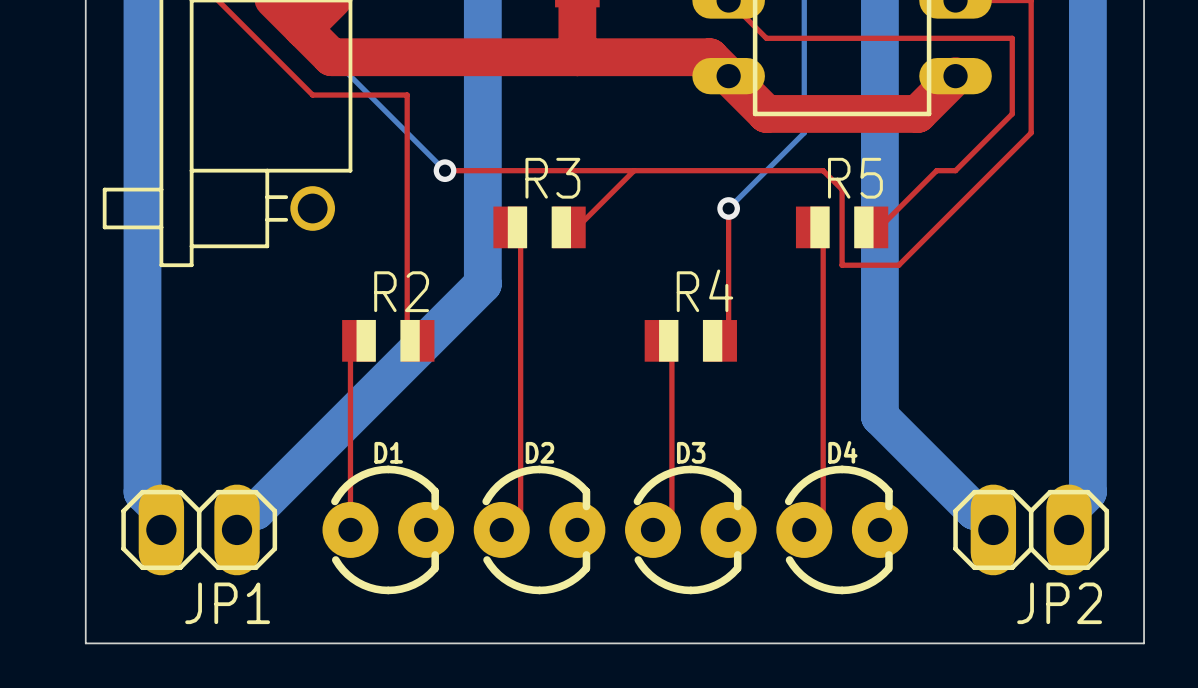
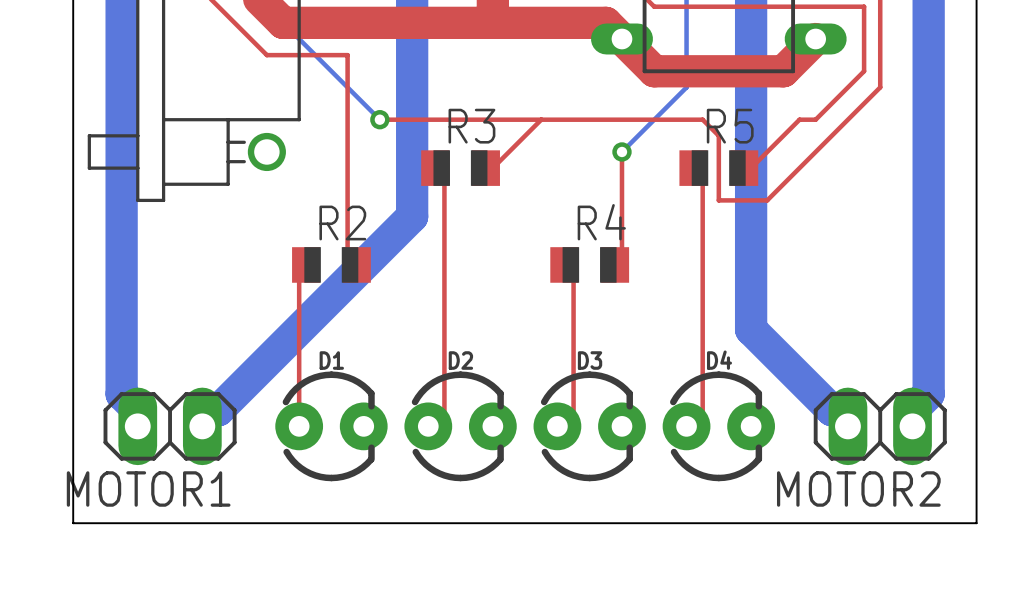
JP1 name: JP1 (227, 603) -> MOTOR1 (148, 488)
JP2 name: JP2 (1059, 603) -> MOTOR2 (858, 488)

